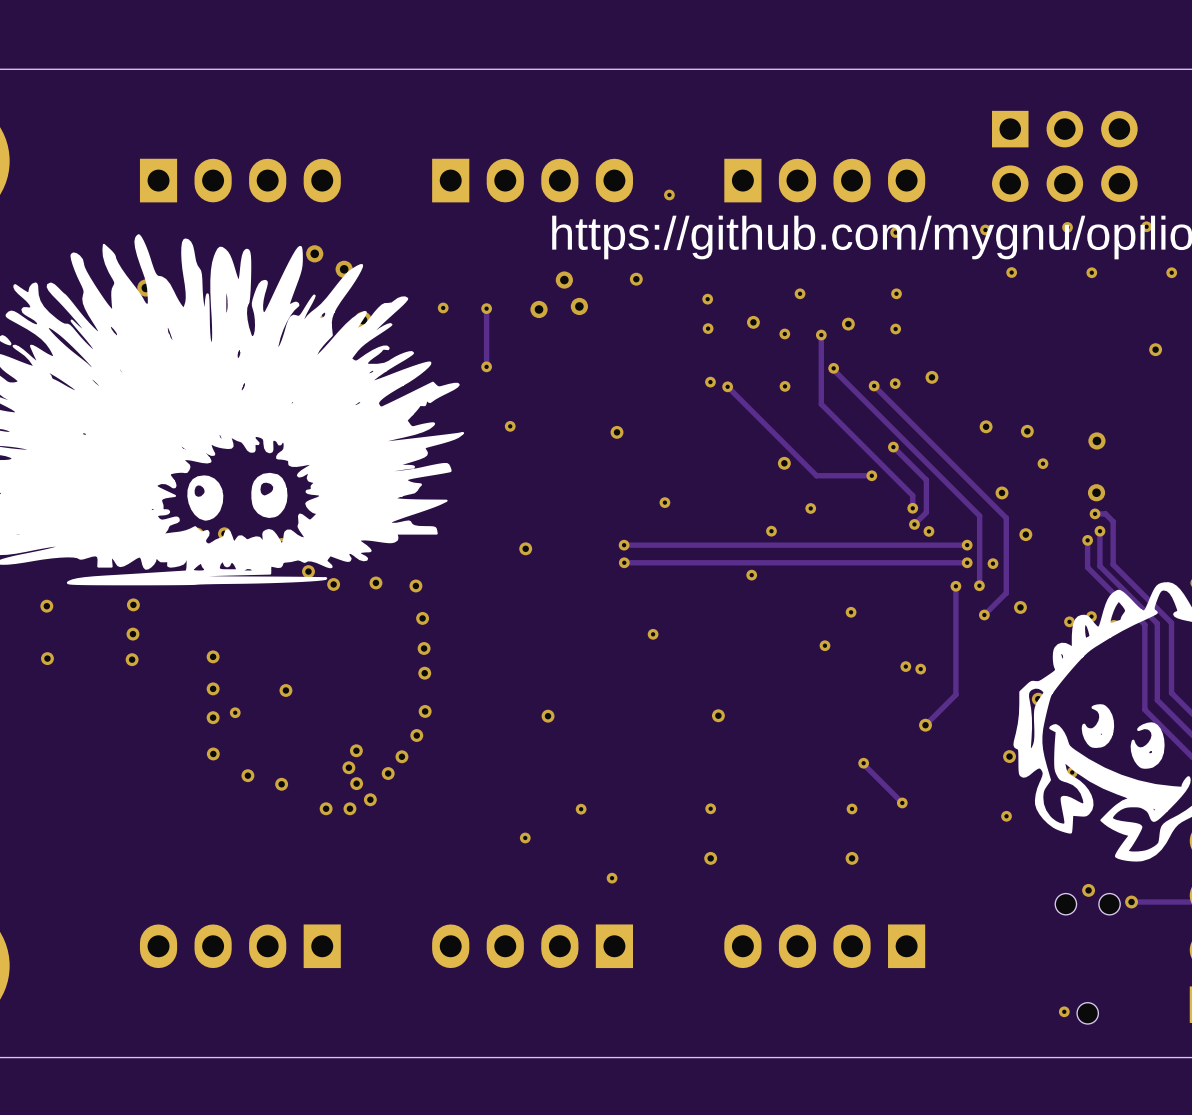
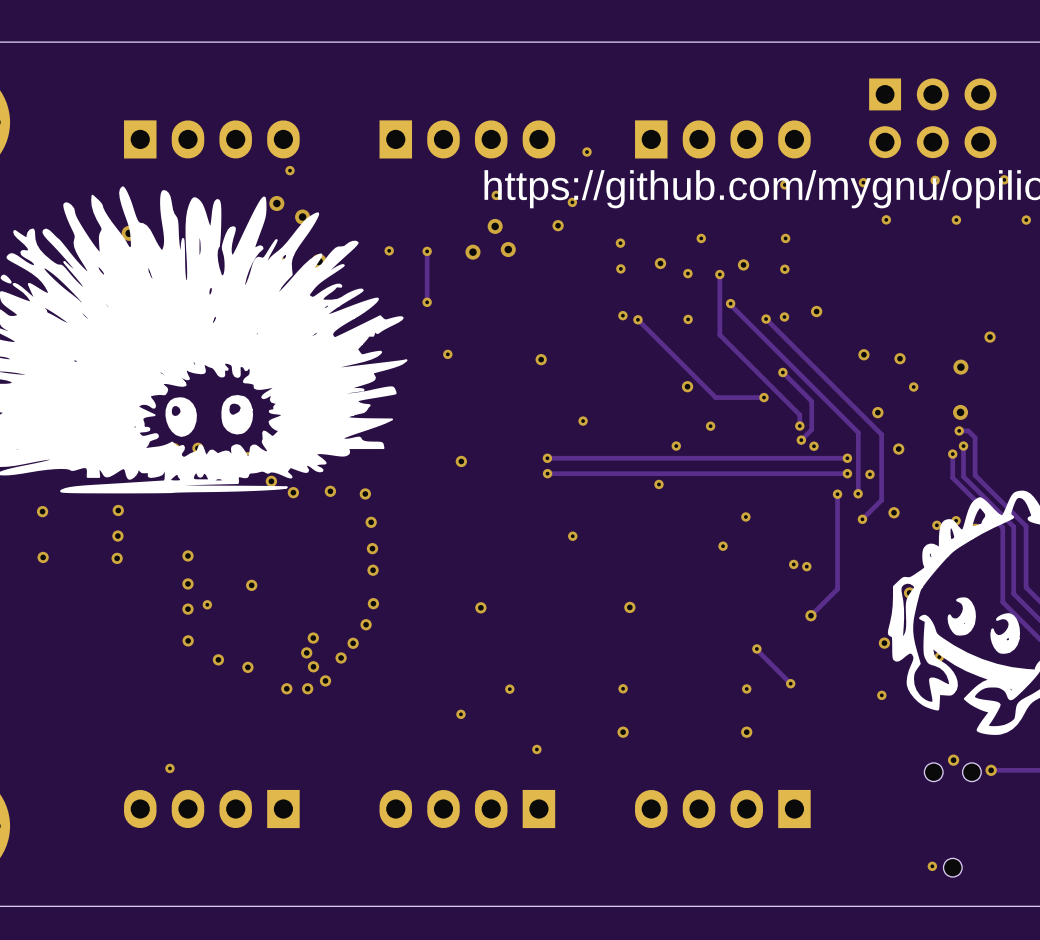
via: none -> (290, 170)
via: none -> (496, 195)
via: none -> (572, 202)
via position: (1155, 349) -> (990, 337)
via: none -> (169, 768)

